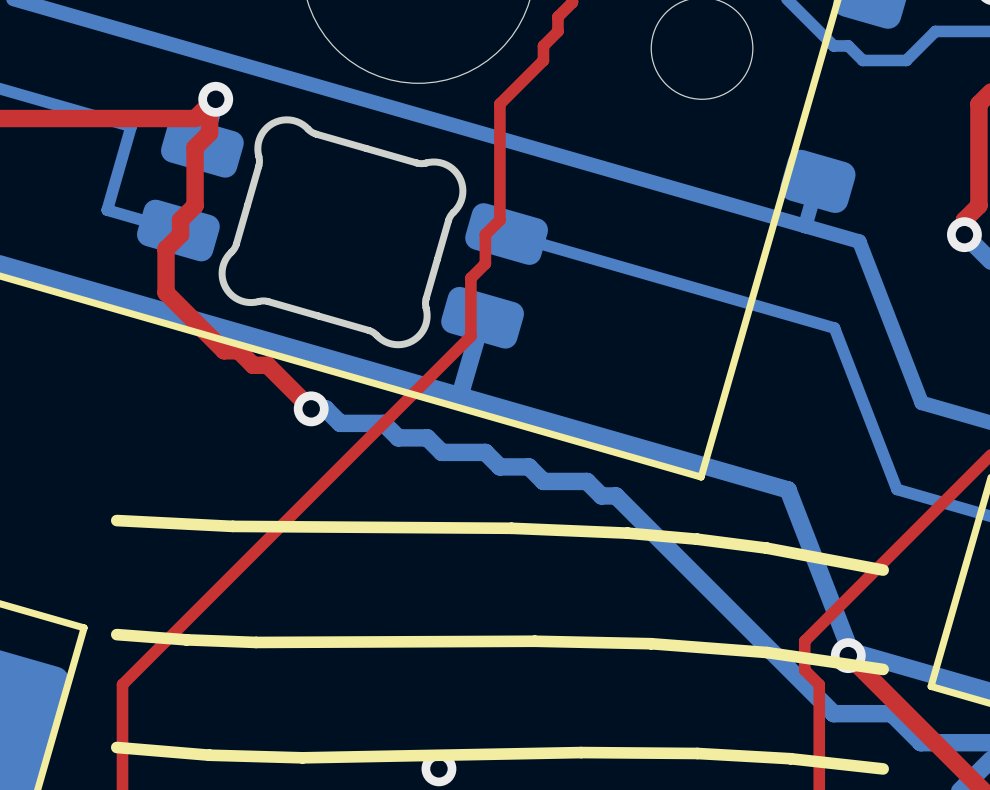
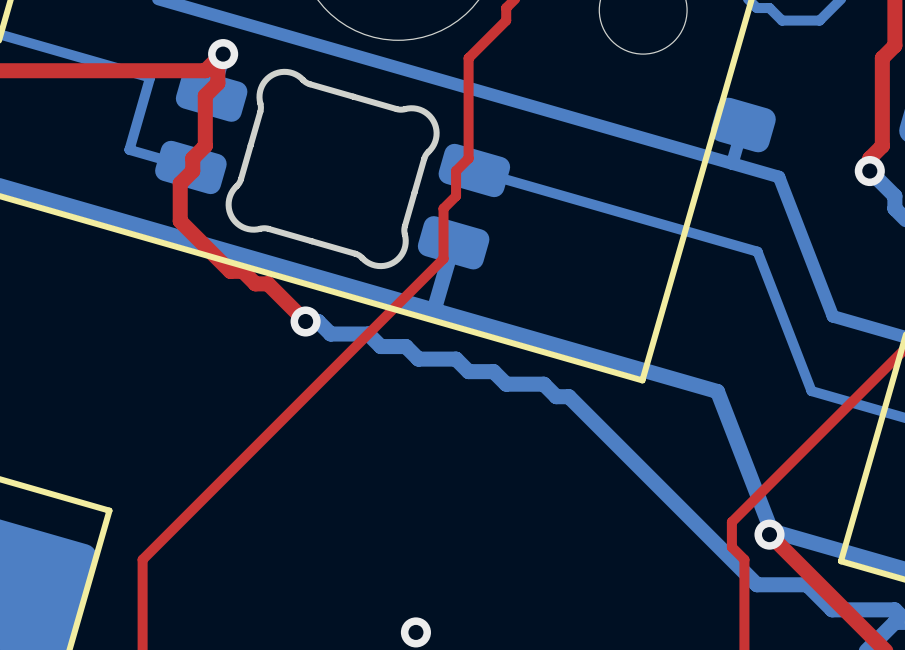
line: (116, 520) (232, 526) (511, 528) (627, 533) (767, 548) (883, 570) -> none
line: (116, 634) (256, 642) (534, 641) (650, 643) (767, 652) (883, 669) -> none
line: (116, 747) (209, 755) (302, 757) (581, 752) (697, 753) (790, 758) (883, 768) -> none

